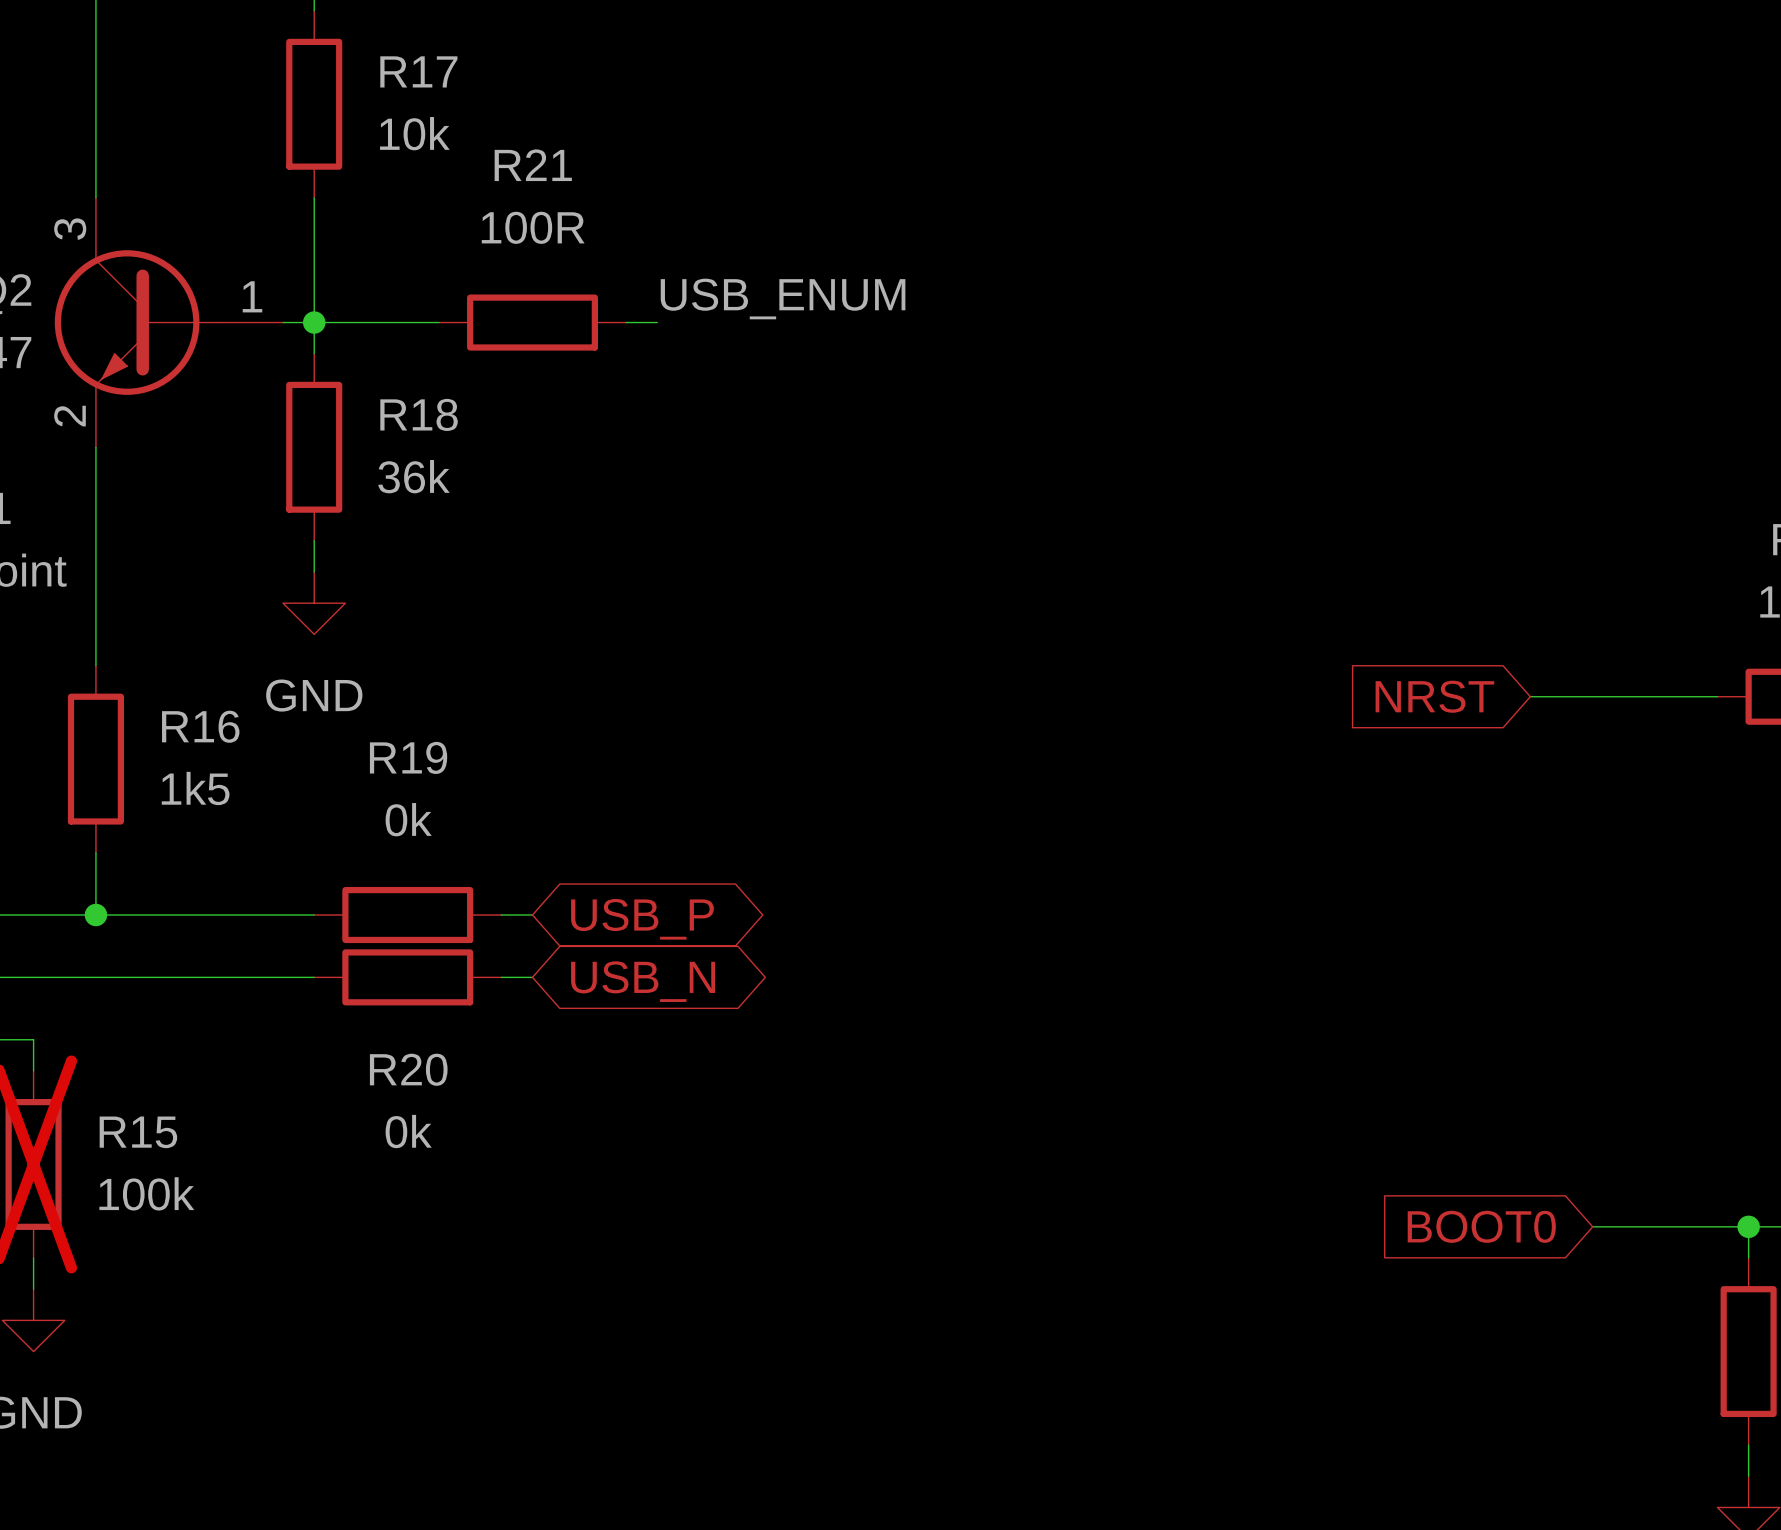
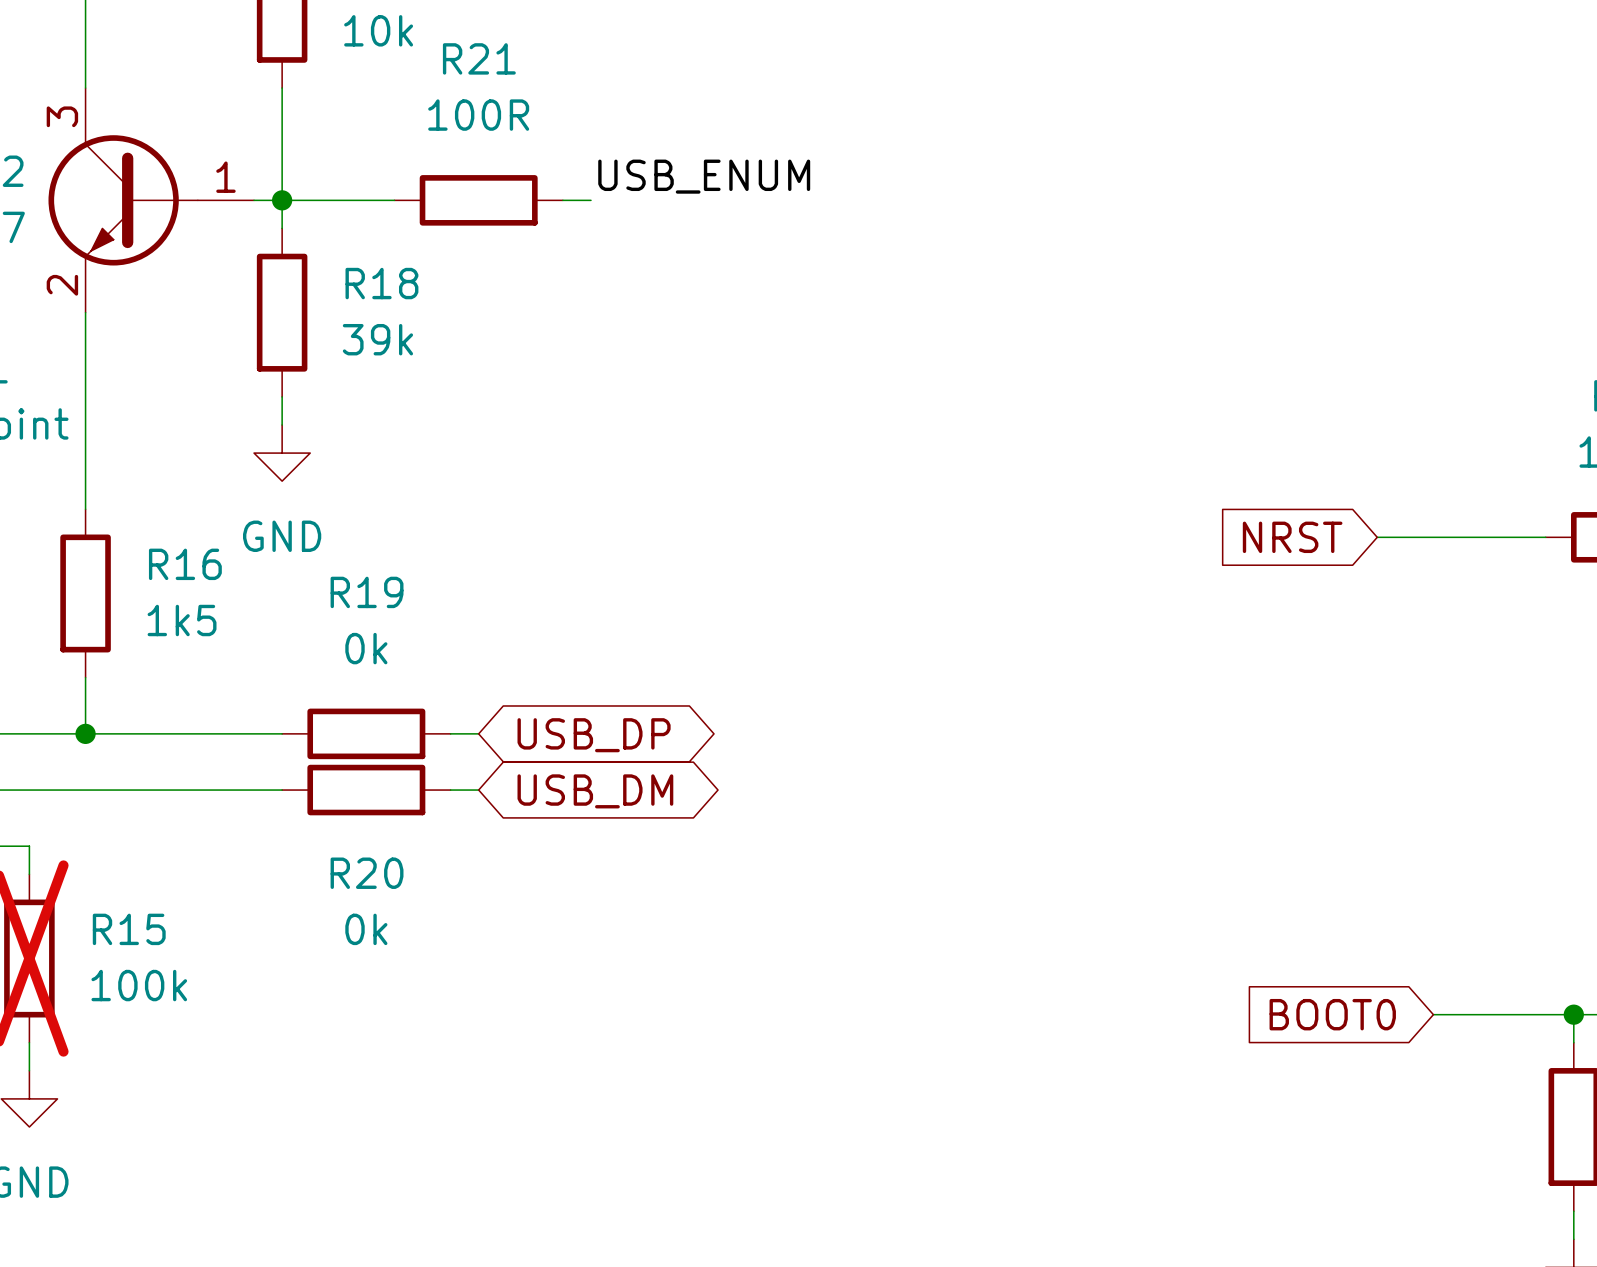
R18 value: 36k (414, 476) -> 39k (377, 339)
global label: USB_P (642, 919) -> USB_DP (594, 735)
global label: USB_N (643, 981) -> USB_DM (595, 791)

